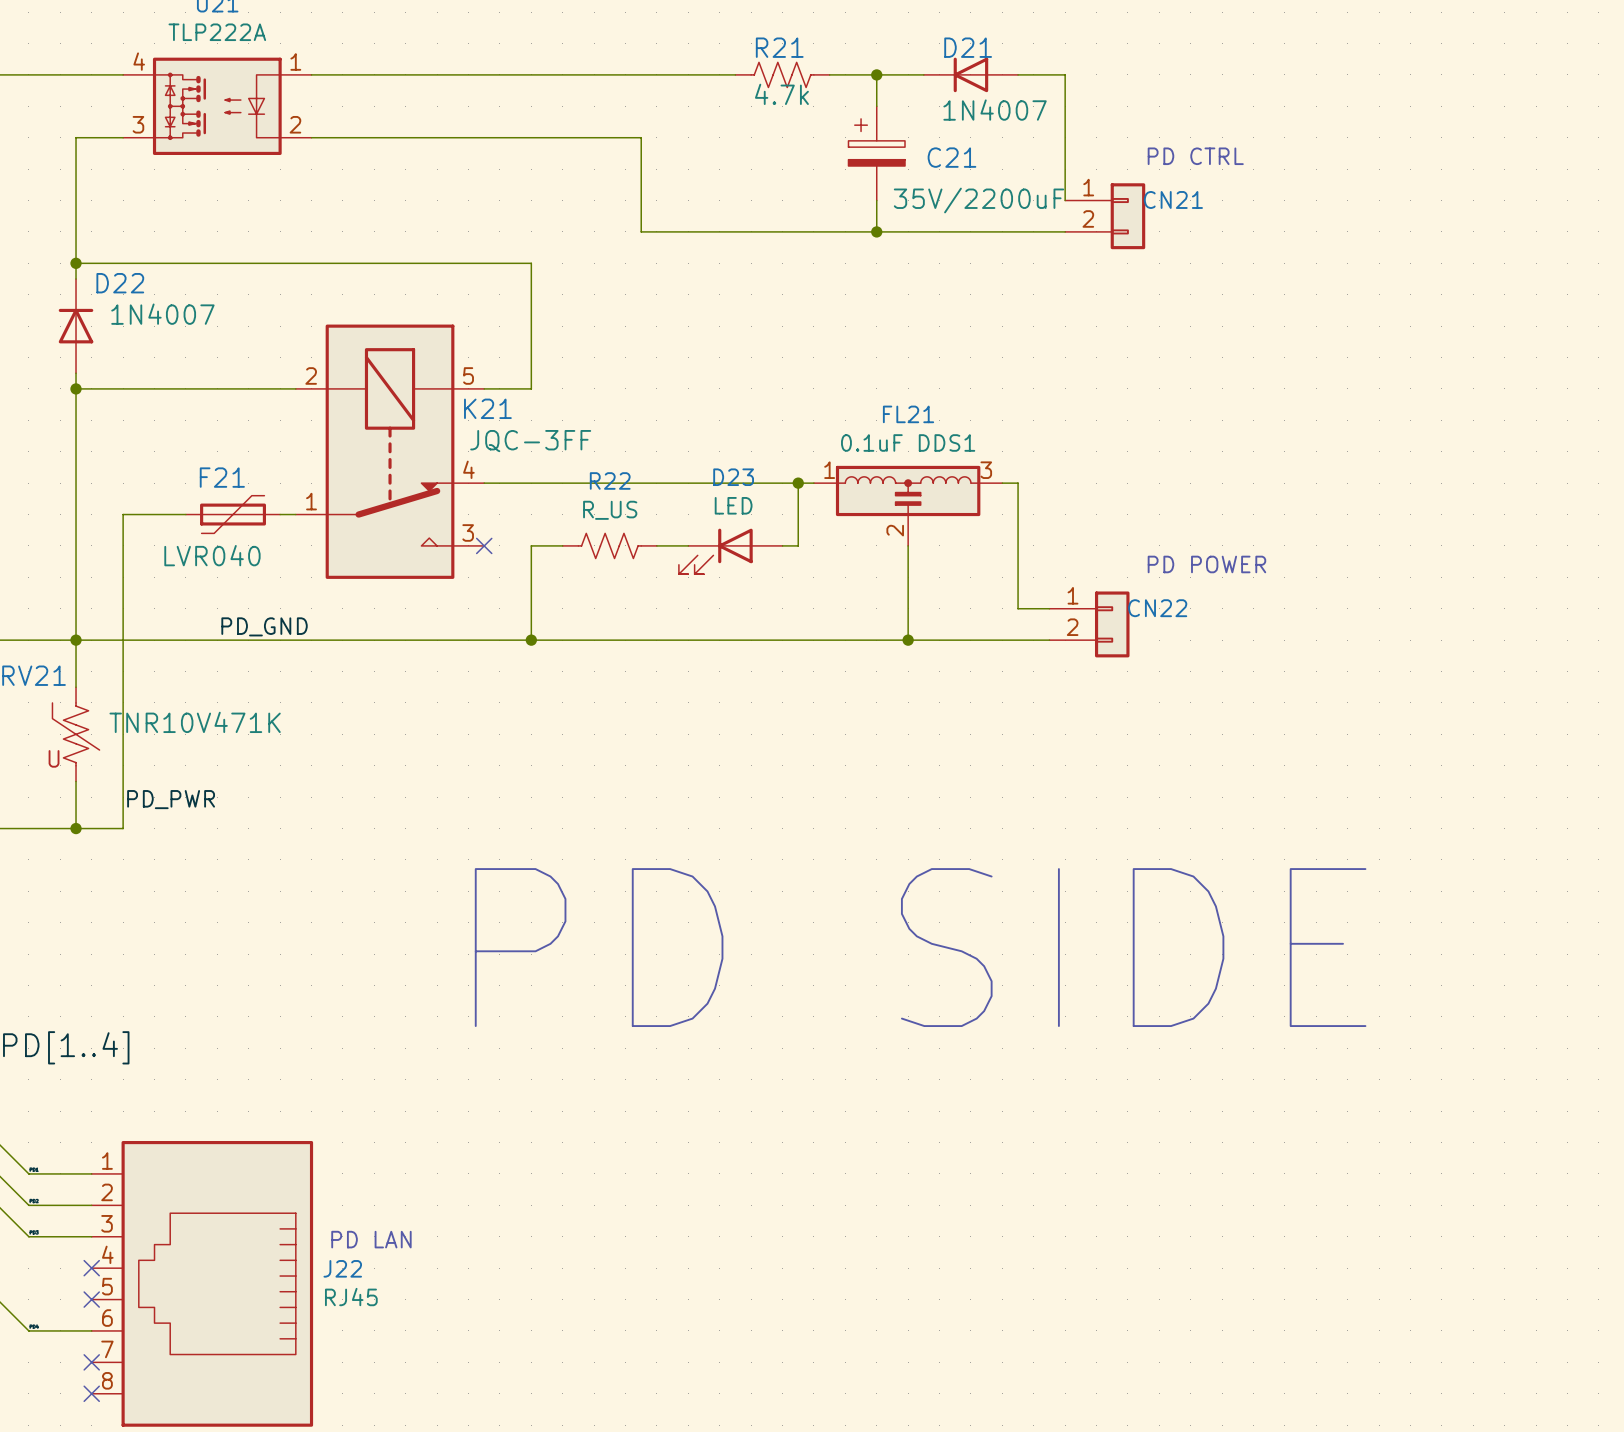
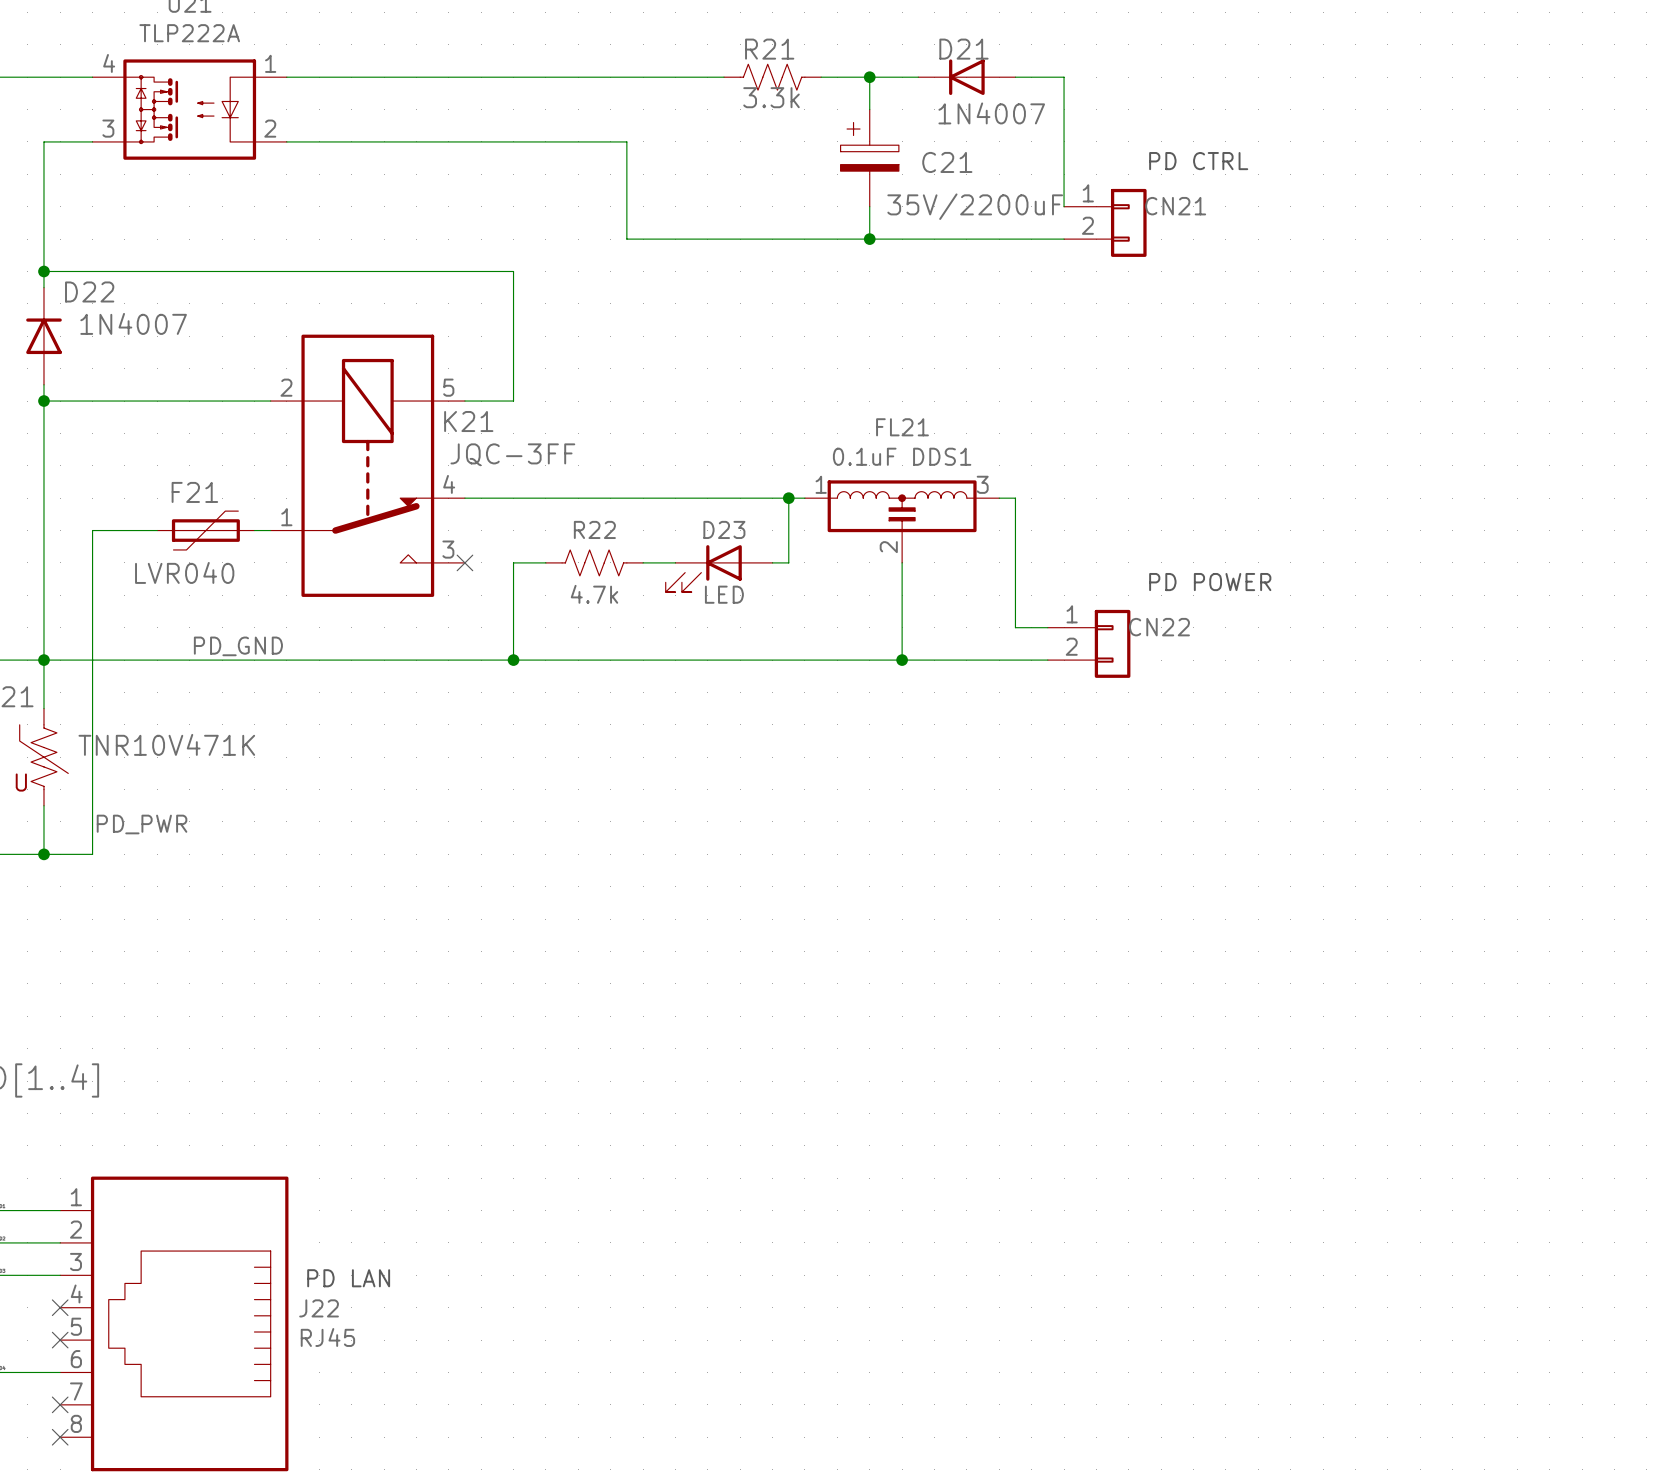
R21 value: 4.7k (781, 94) -> 3.3k (771, 97)
D23 name position: D23 (733, 477) -> D23 (724, 529)
R22 name position: R22 (610, 480) -> R22 (594, 529)
D23 value position: LED (733, 505) -> LED (724, 594)
R22 value: R_US (610, 510) -> 4.7k (594, 594)
text: PD SIDE (920, 947) -> none

